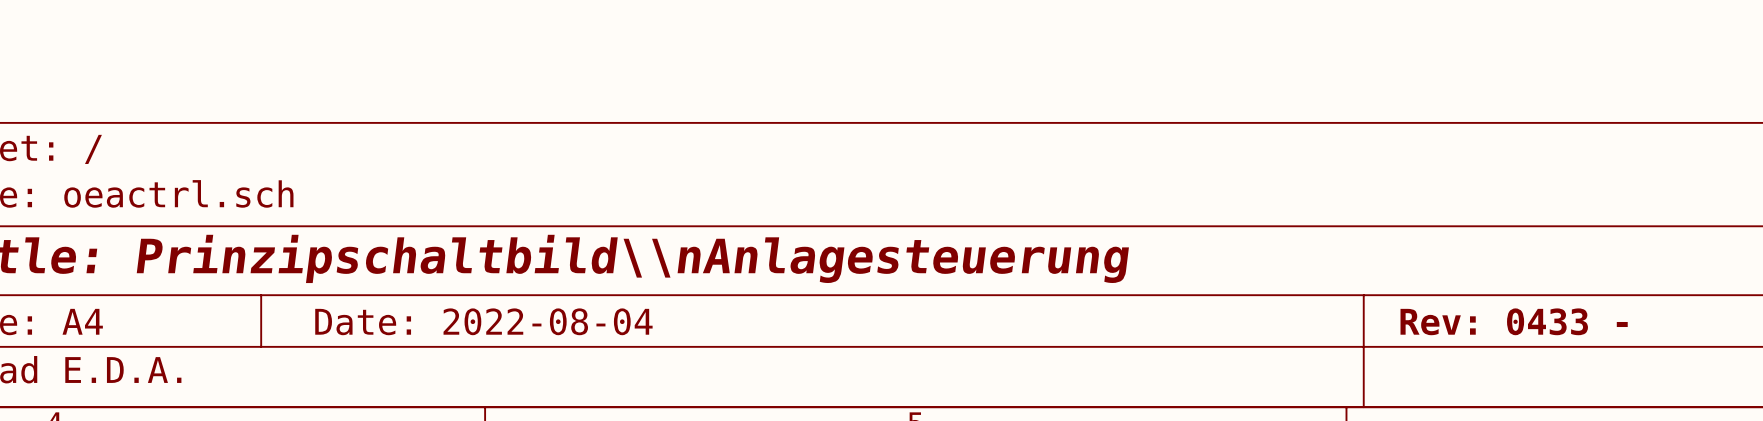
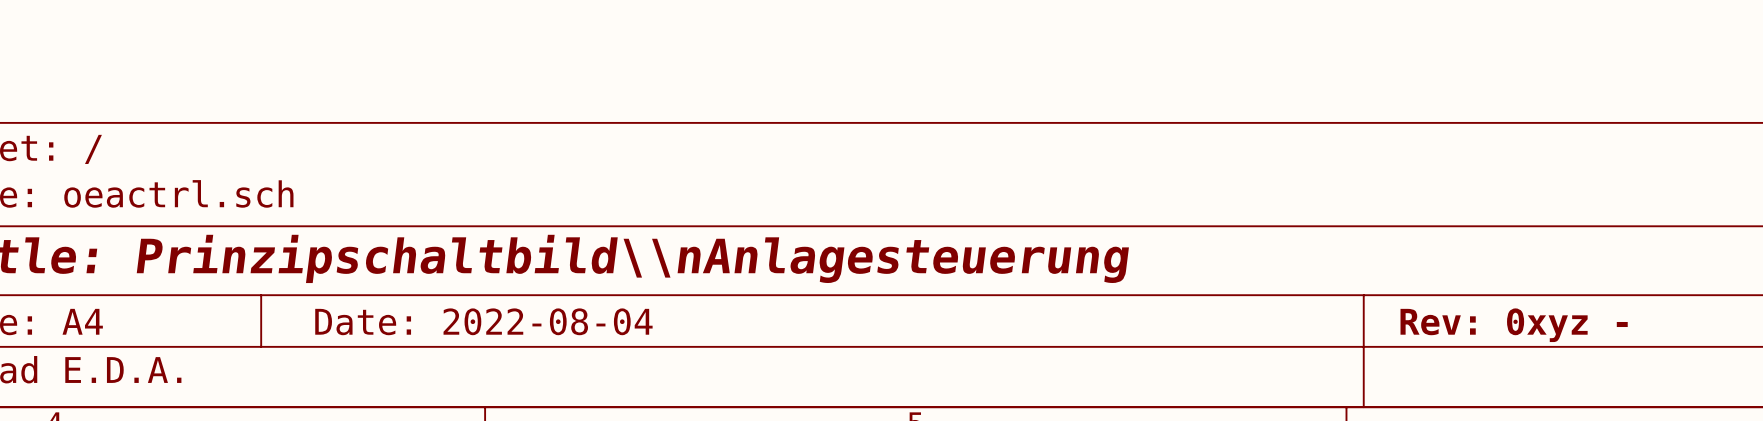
title block: Rev: 0433 - (1514, 321) -> Rev: 0xyz - (1514, 325)

